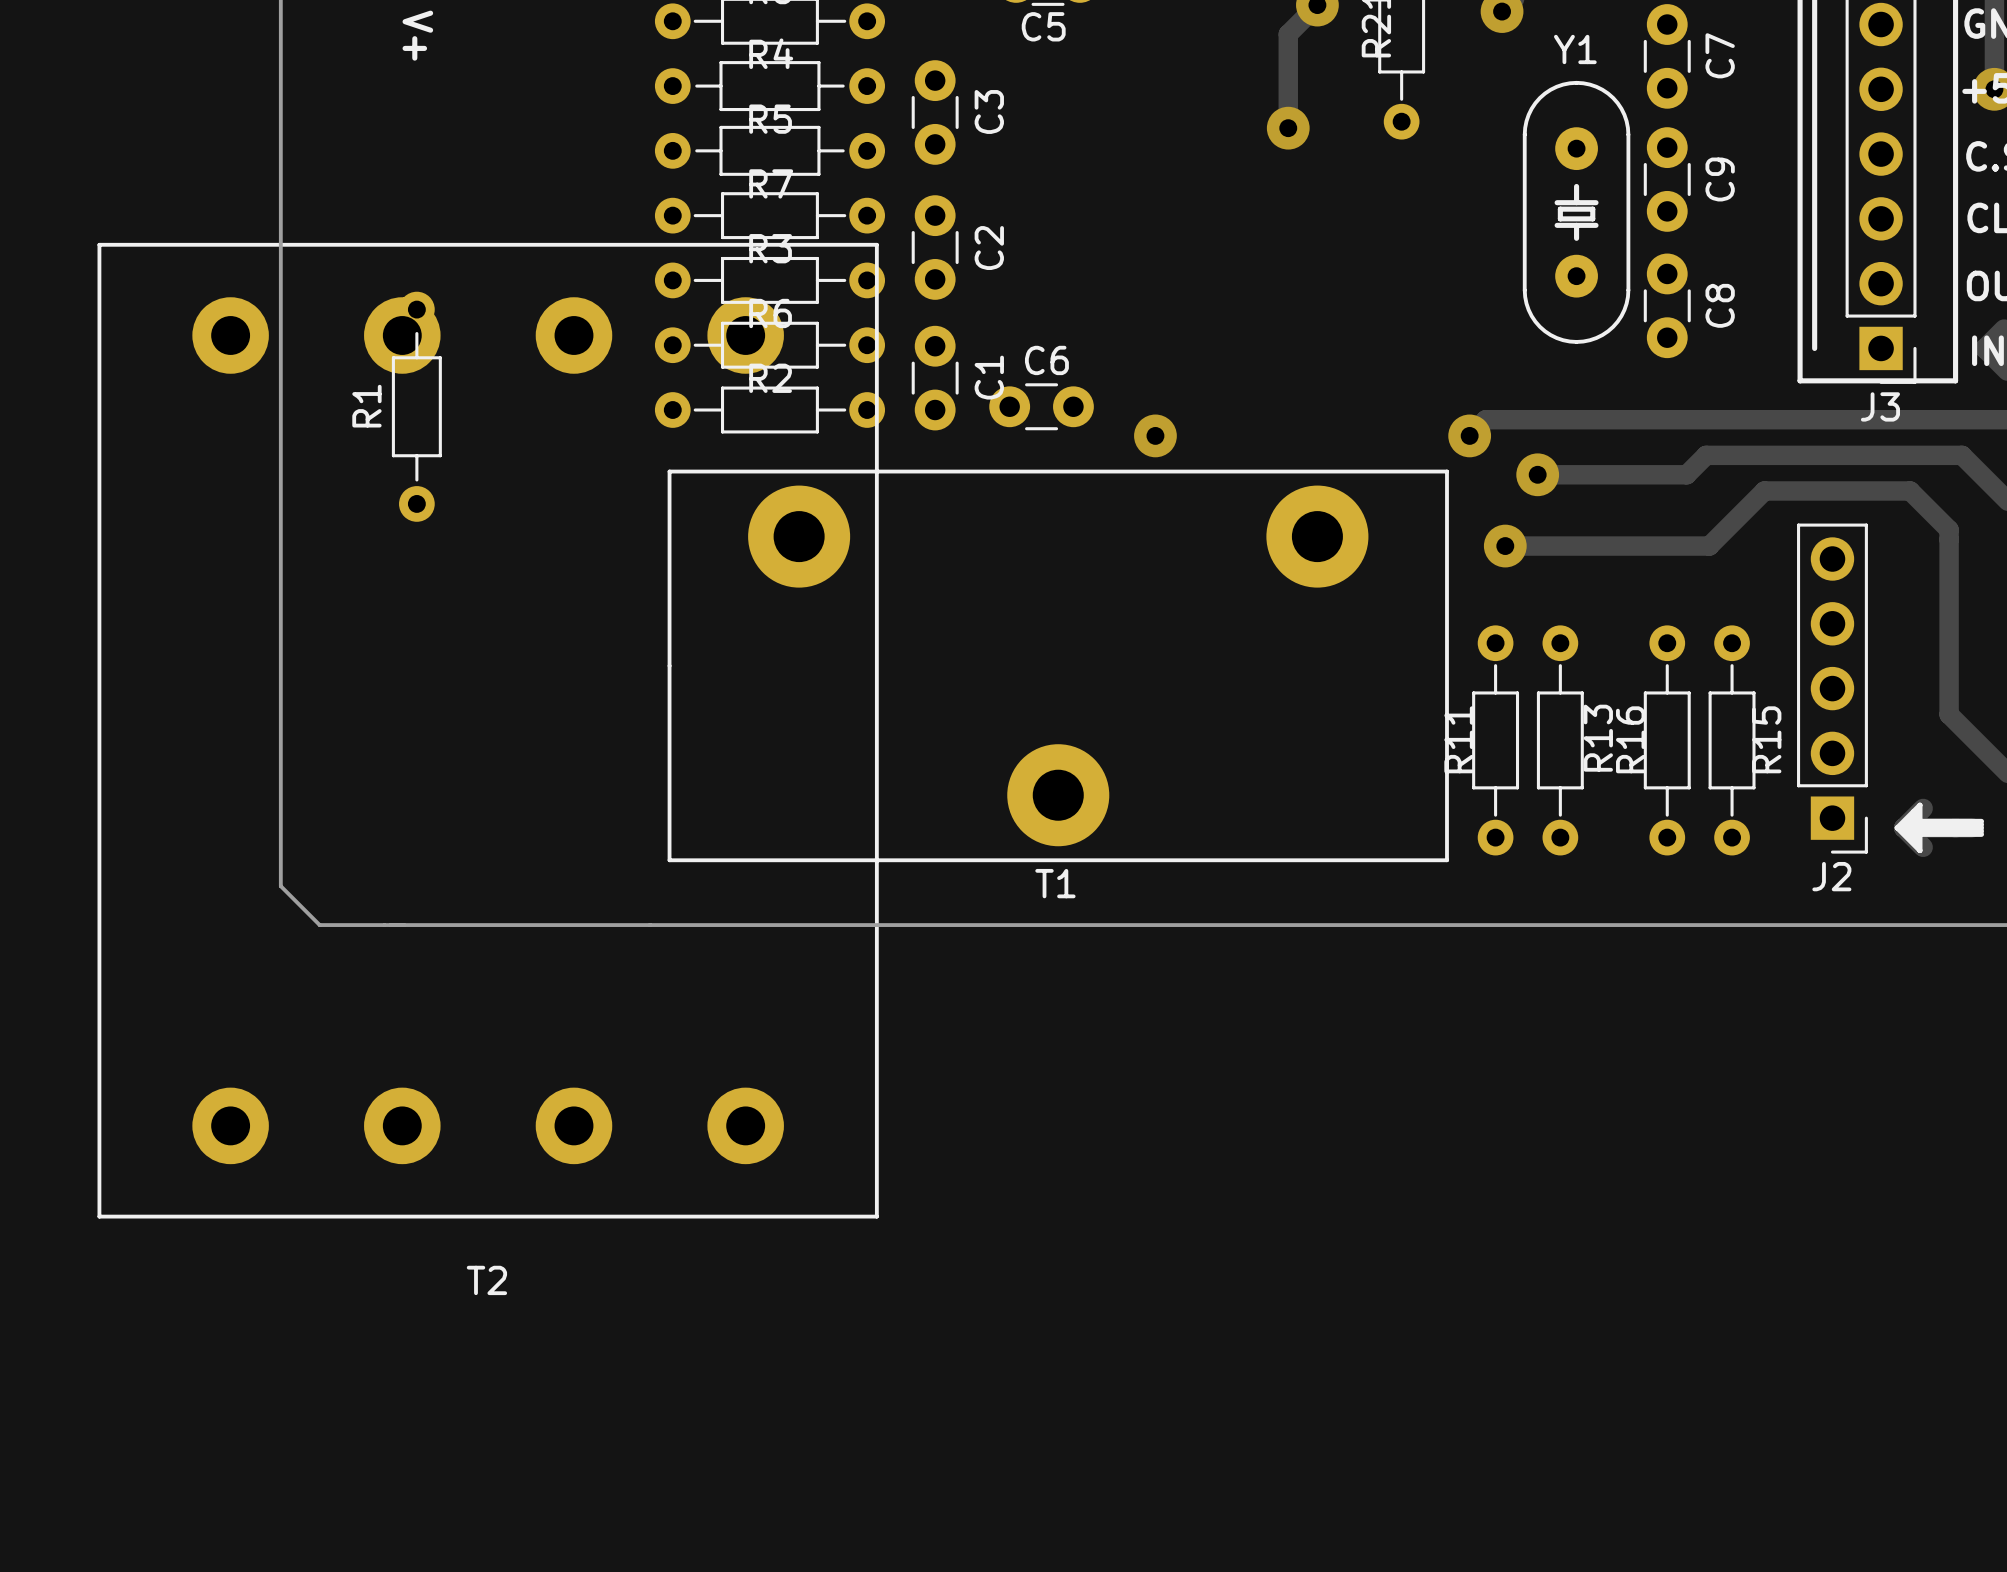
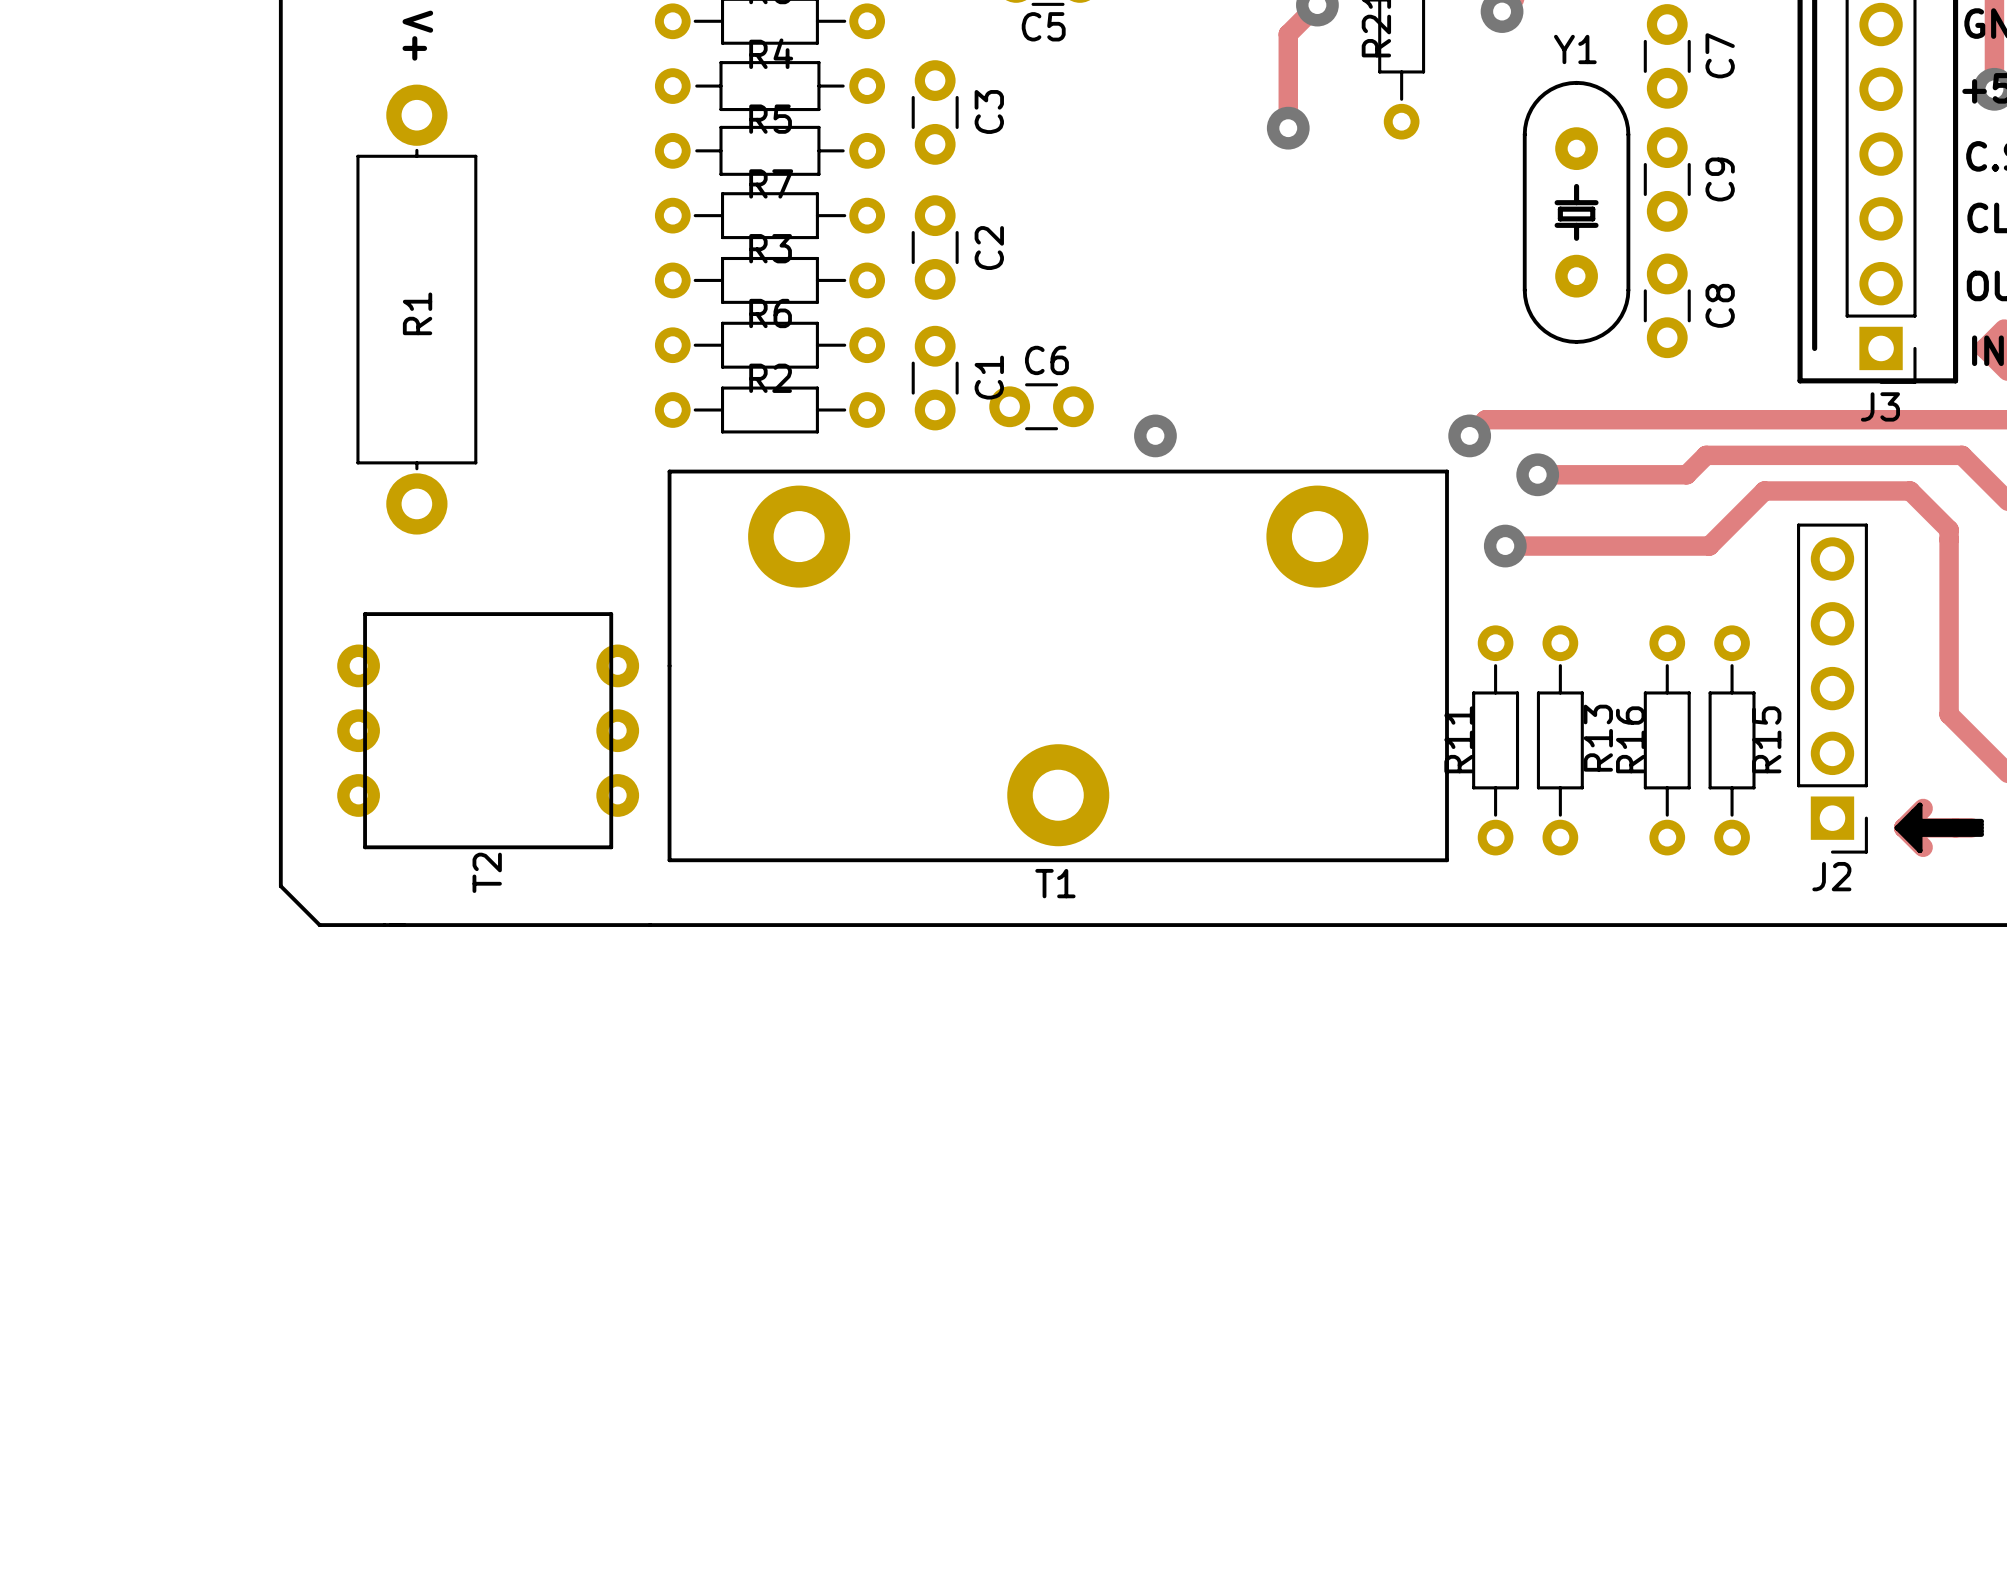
T2 footprint: [97, 242, 879, 1219] -> [337, 612, 640, 850]
R1 footprint: [391, 291, 442, 522] -> [356, 84, 478, 535]
T2 name position: T2 (486, 1280) -> T2 (487, 872)

